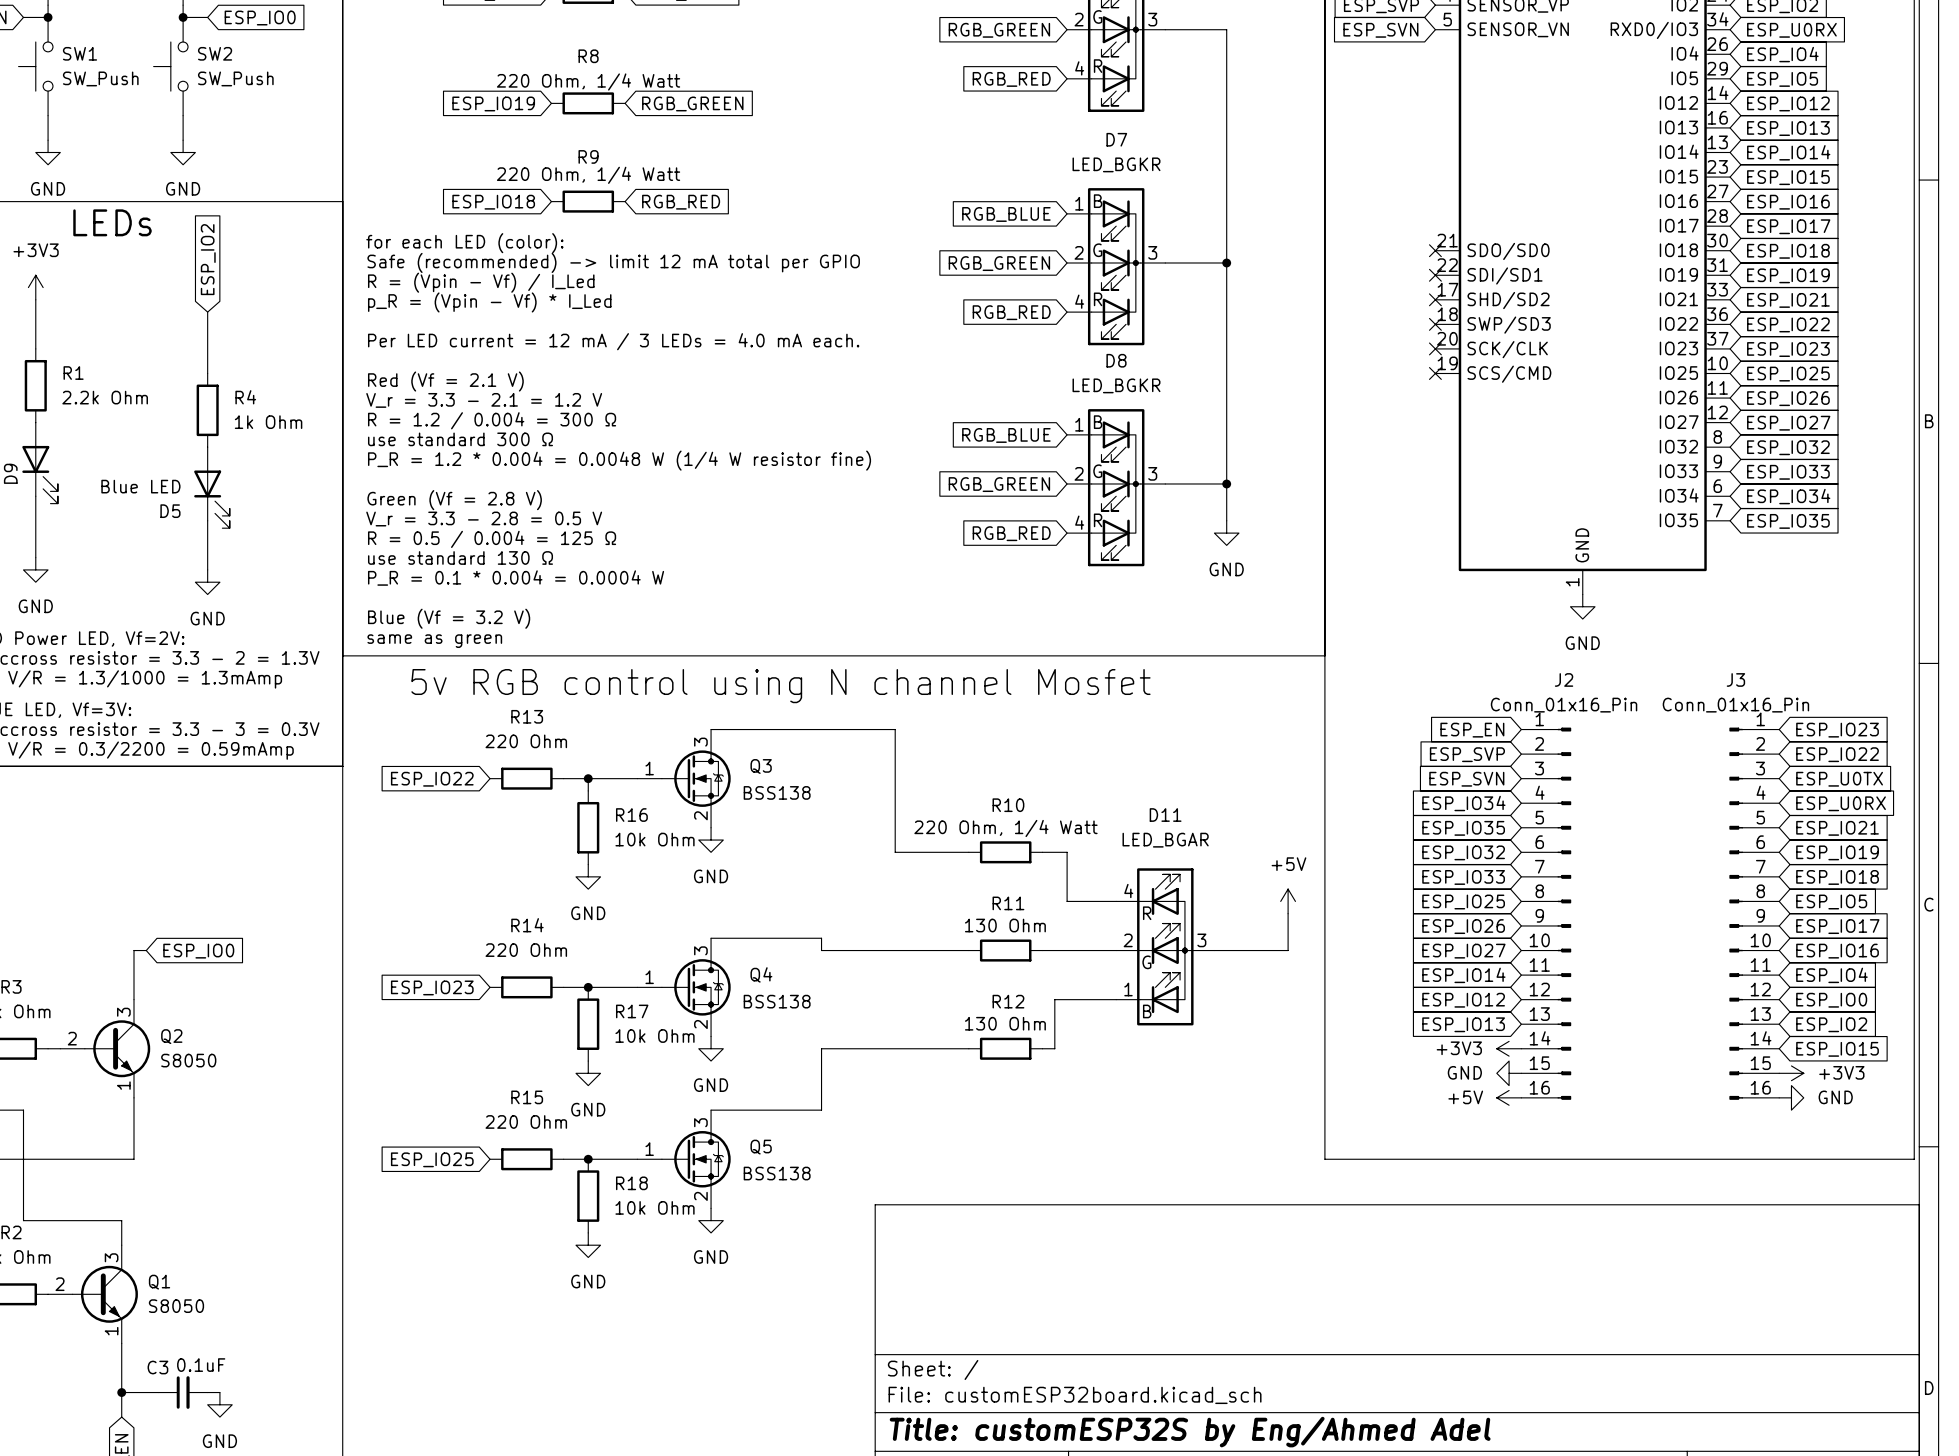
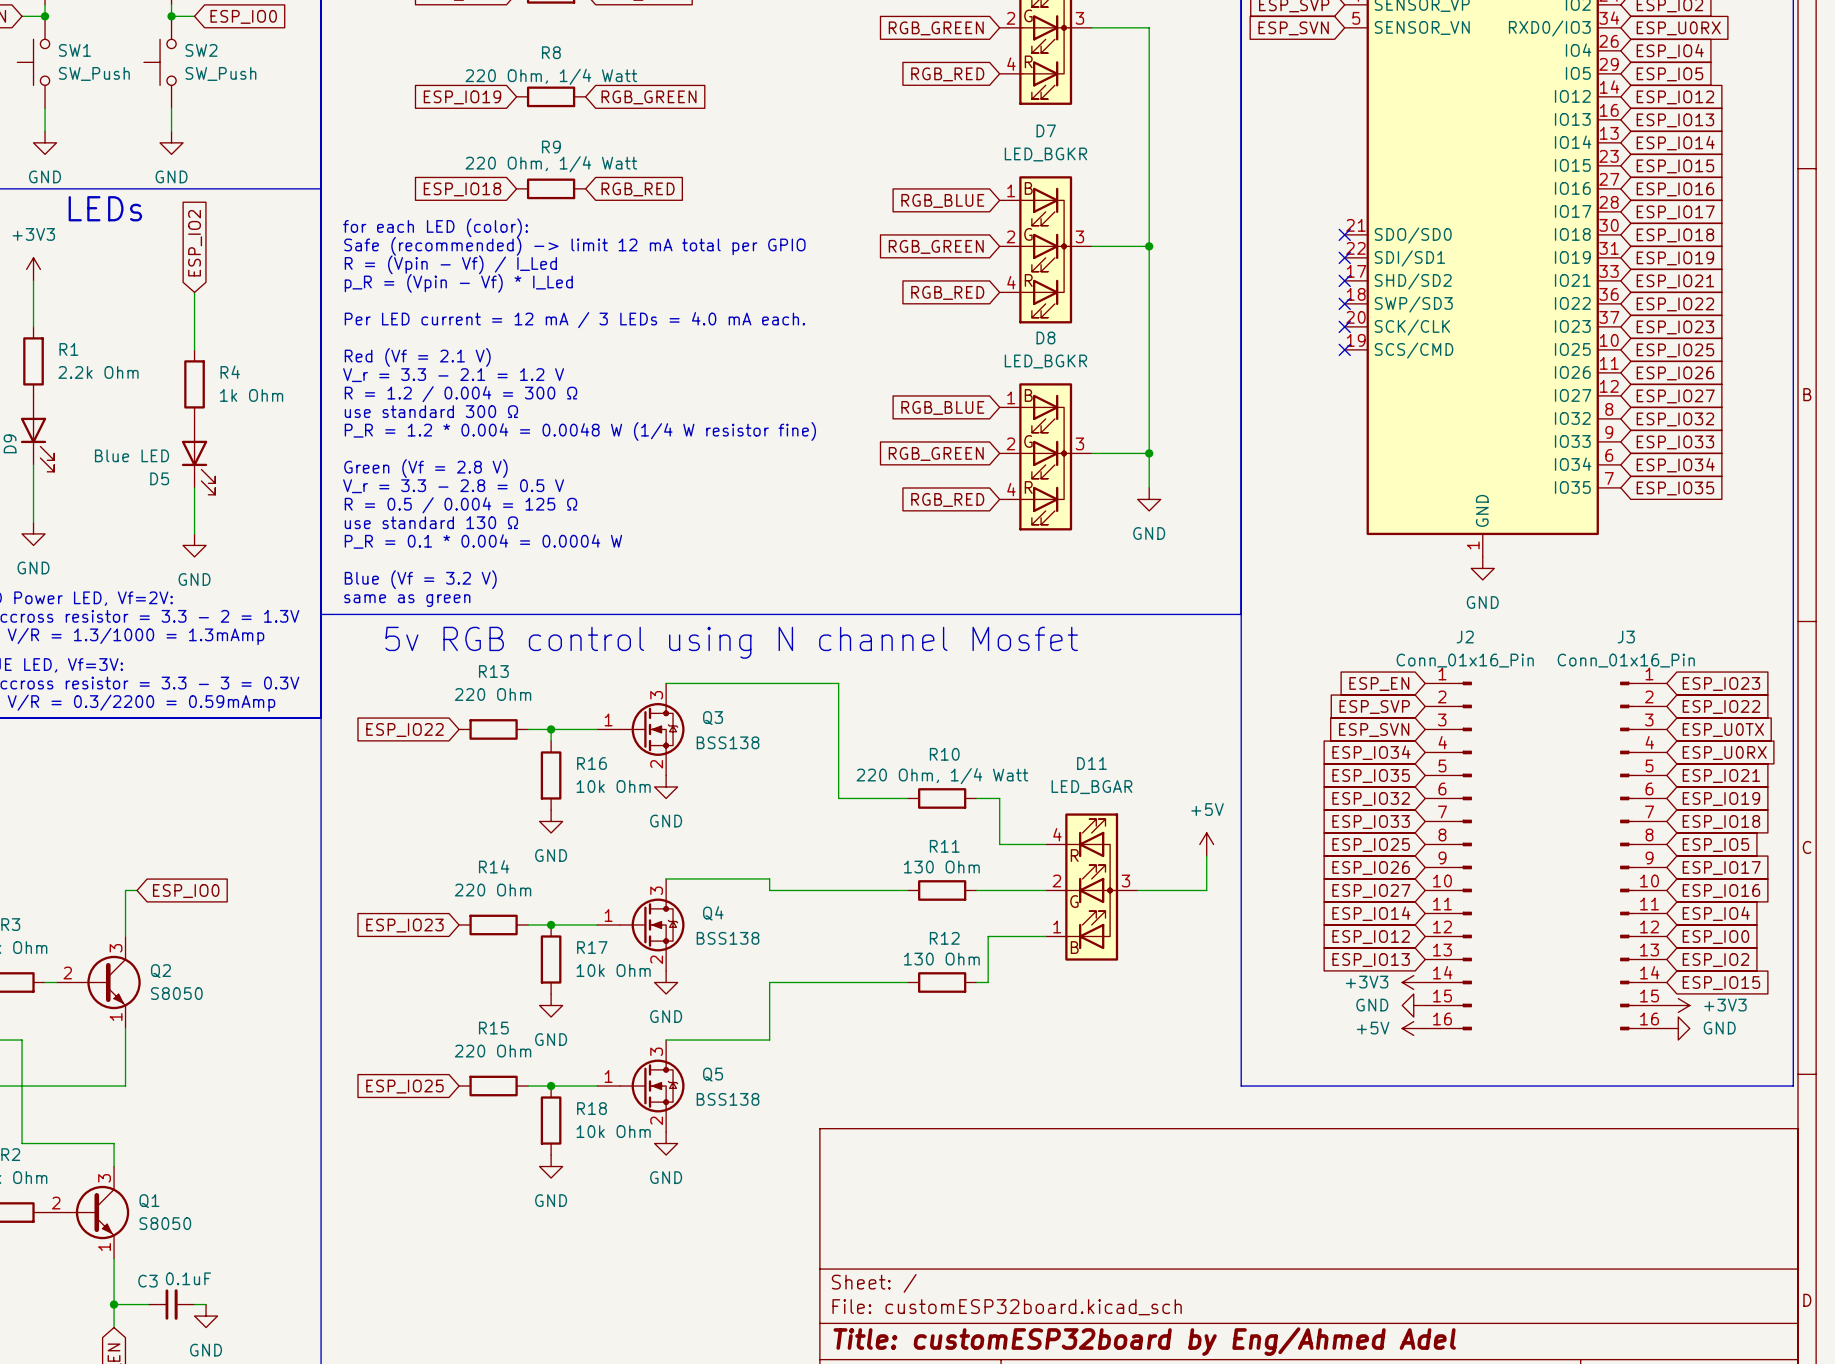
title block: Title: customESP32S by Eng/Ahmed Adel (1190, 1432) -> Title: customESP32board by Eng/Ahmed Adel (1144, 1341)

